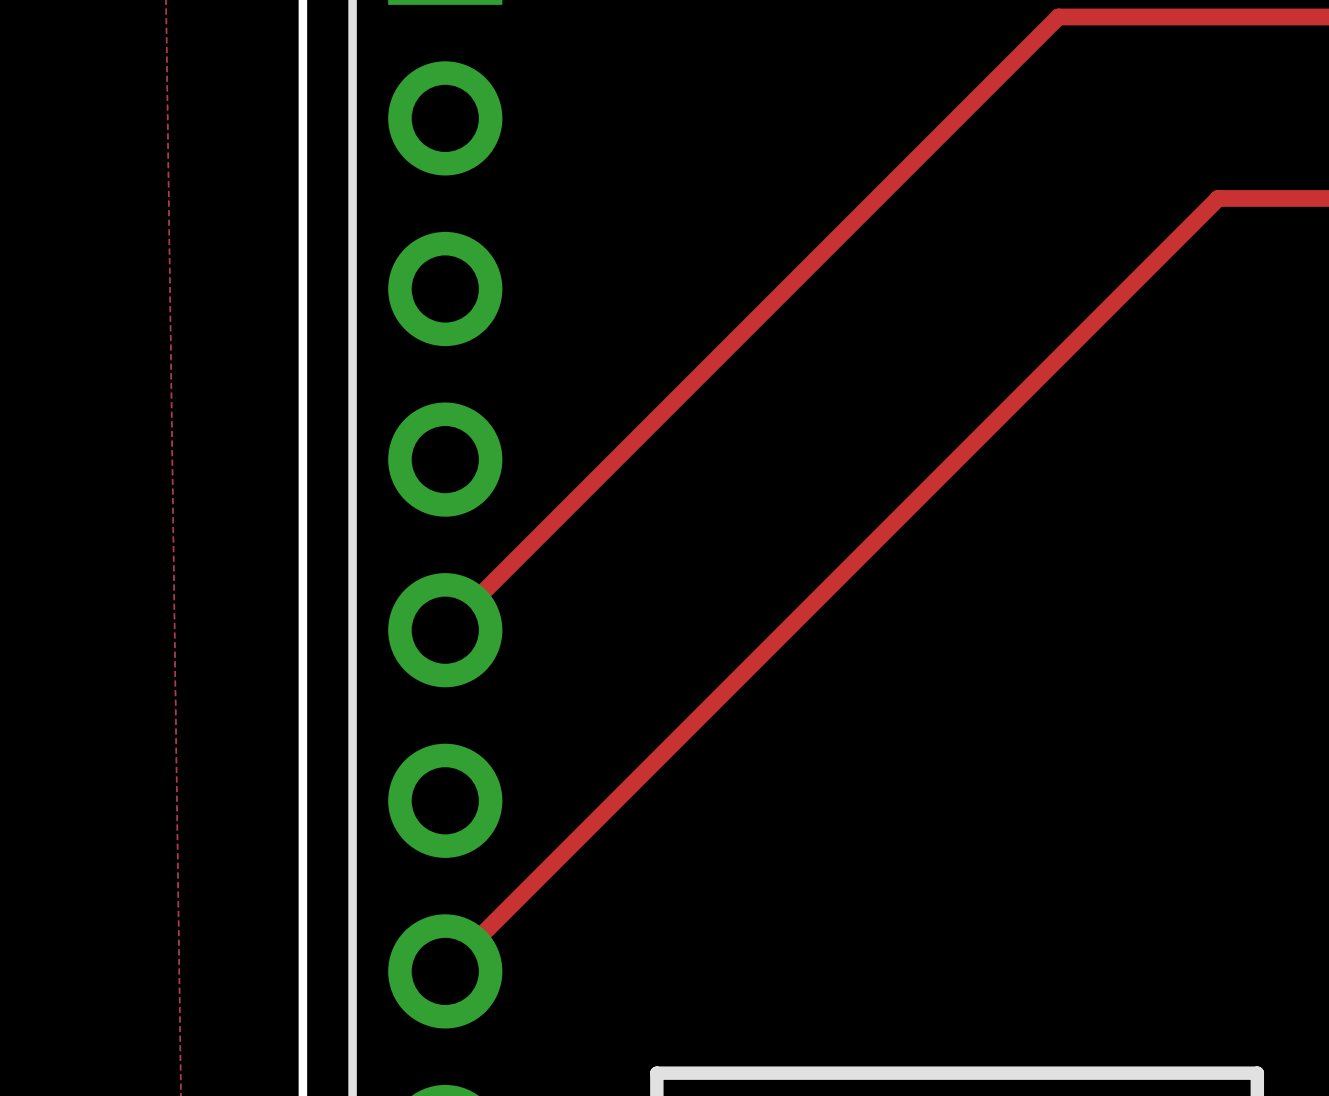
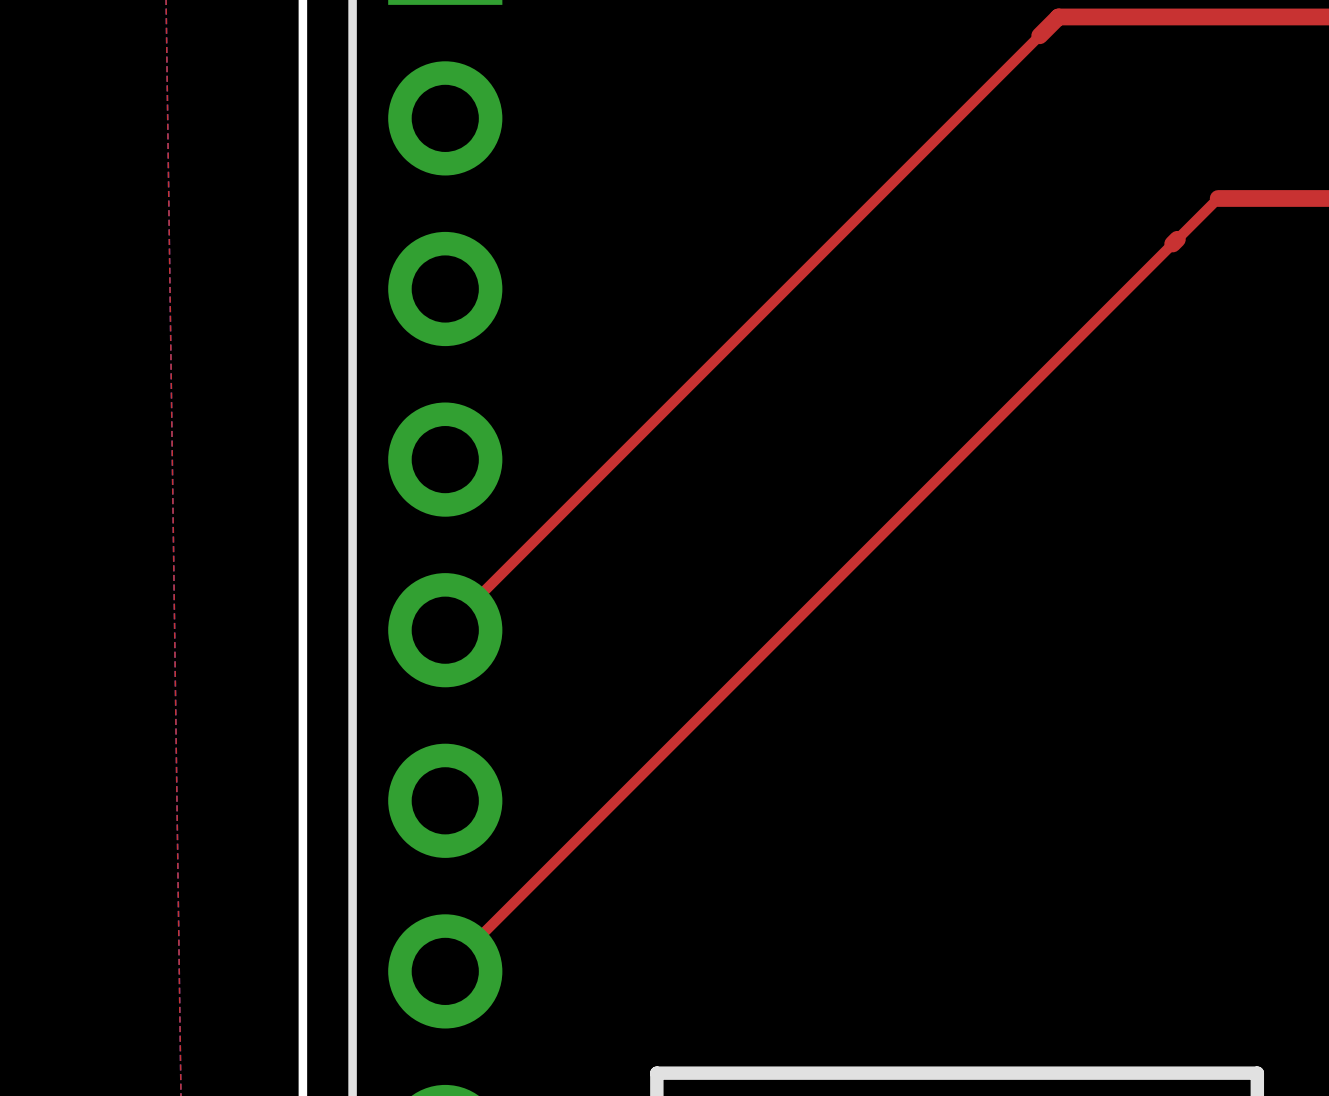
top track width: thick (1039, 35) (445, 630) -> thin (1039, 35) (445, 630)
top track width: thick (1218, 198) (1177, 239) -> thin (1218, 198) (1177, 239)
top track width: thick (1172, 243) (445, 971) -> thin (1172, 243) (445, 971)

